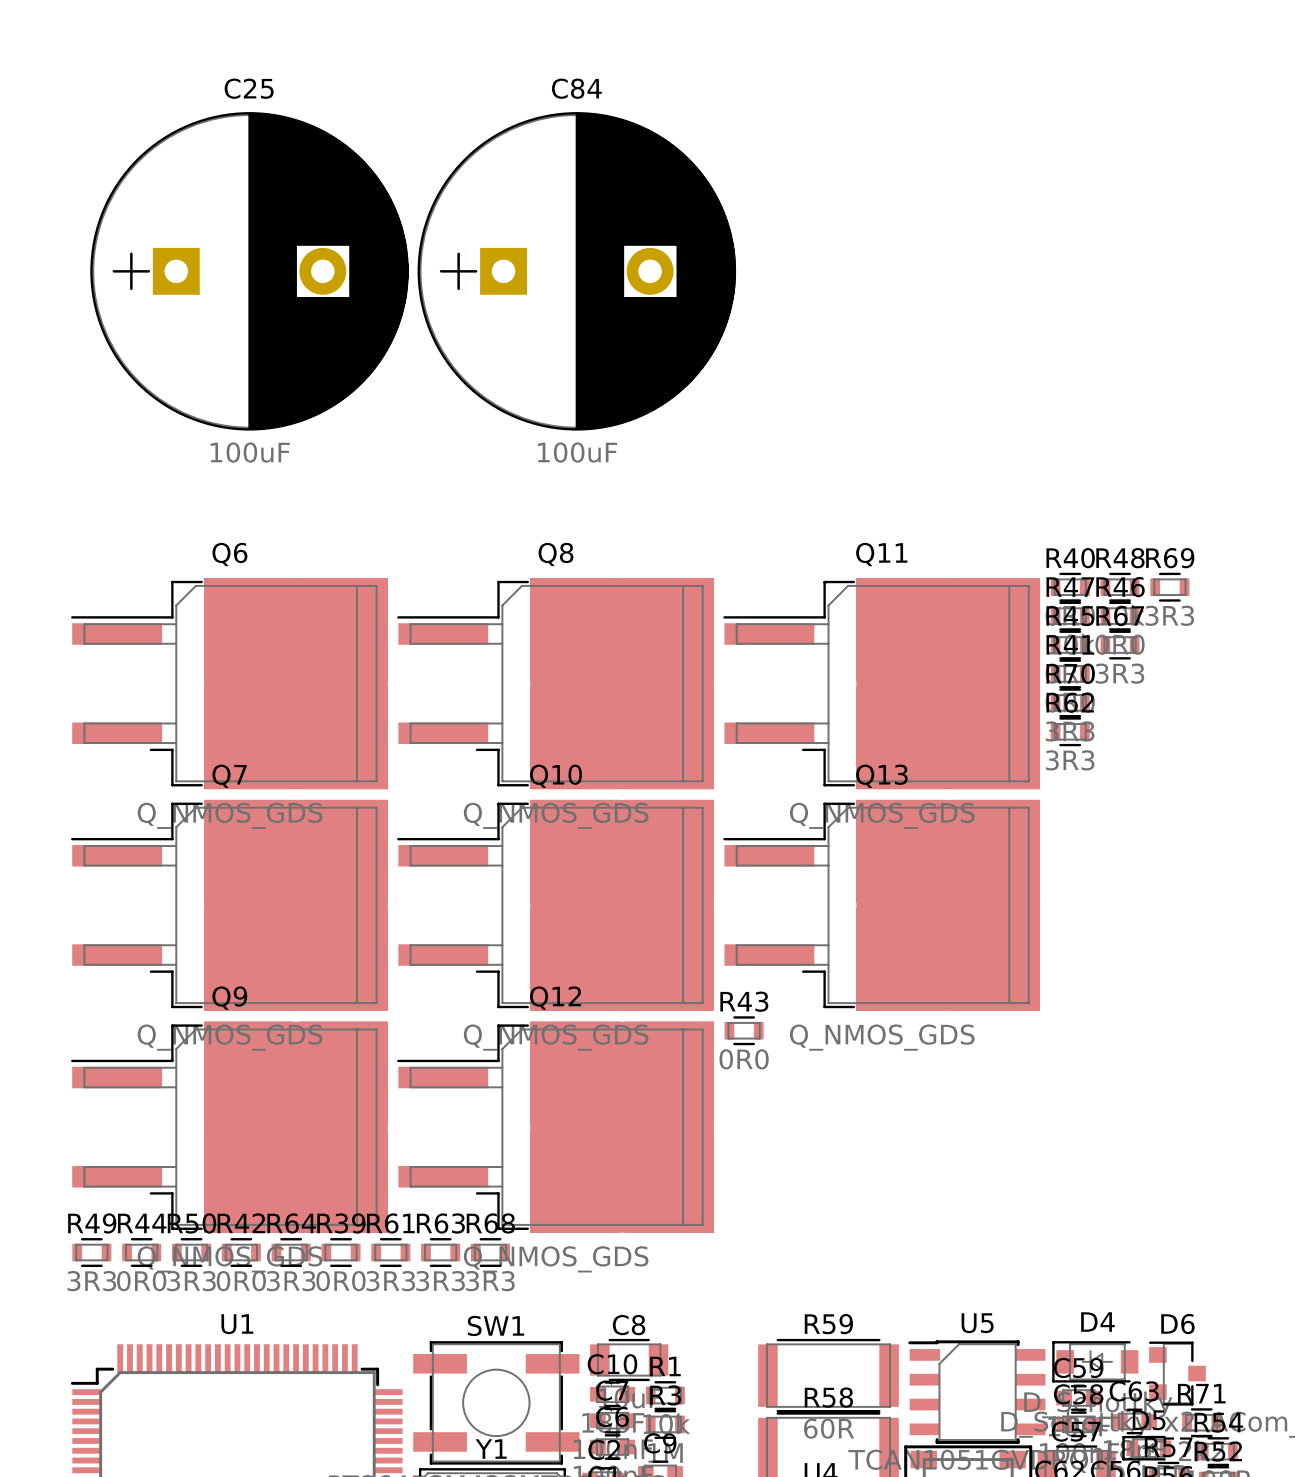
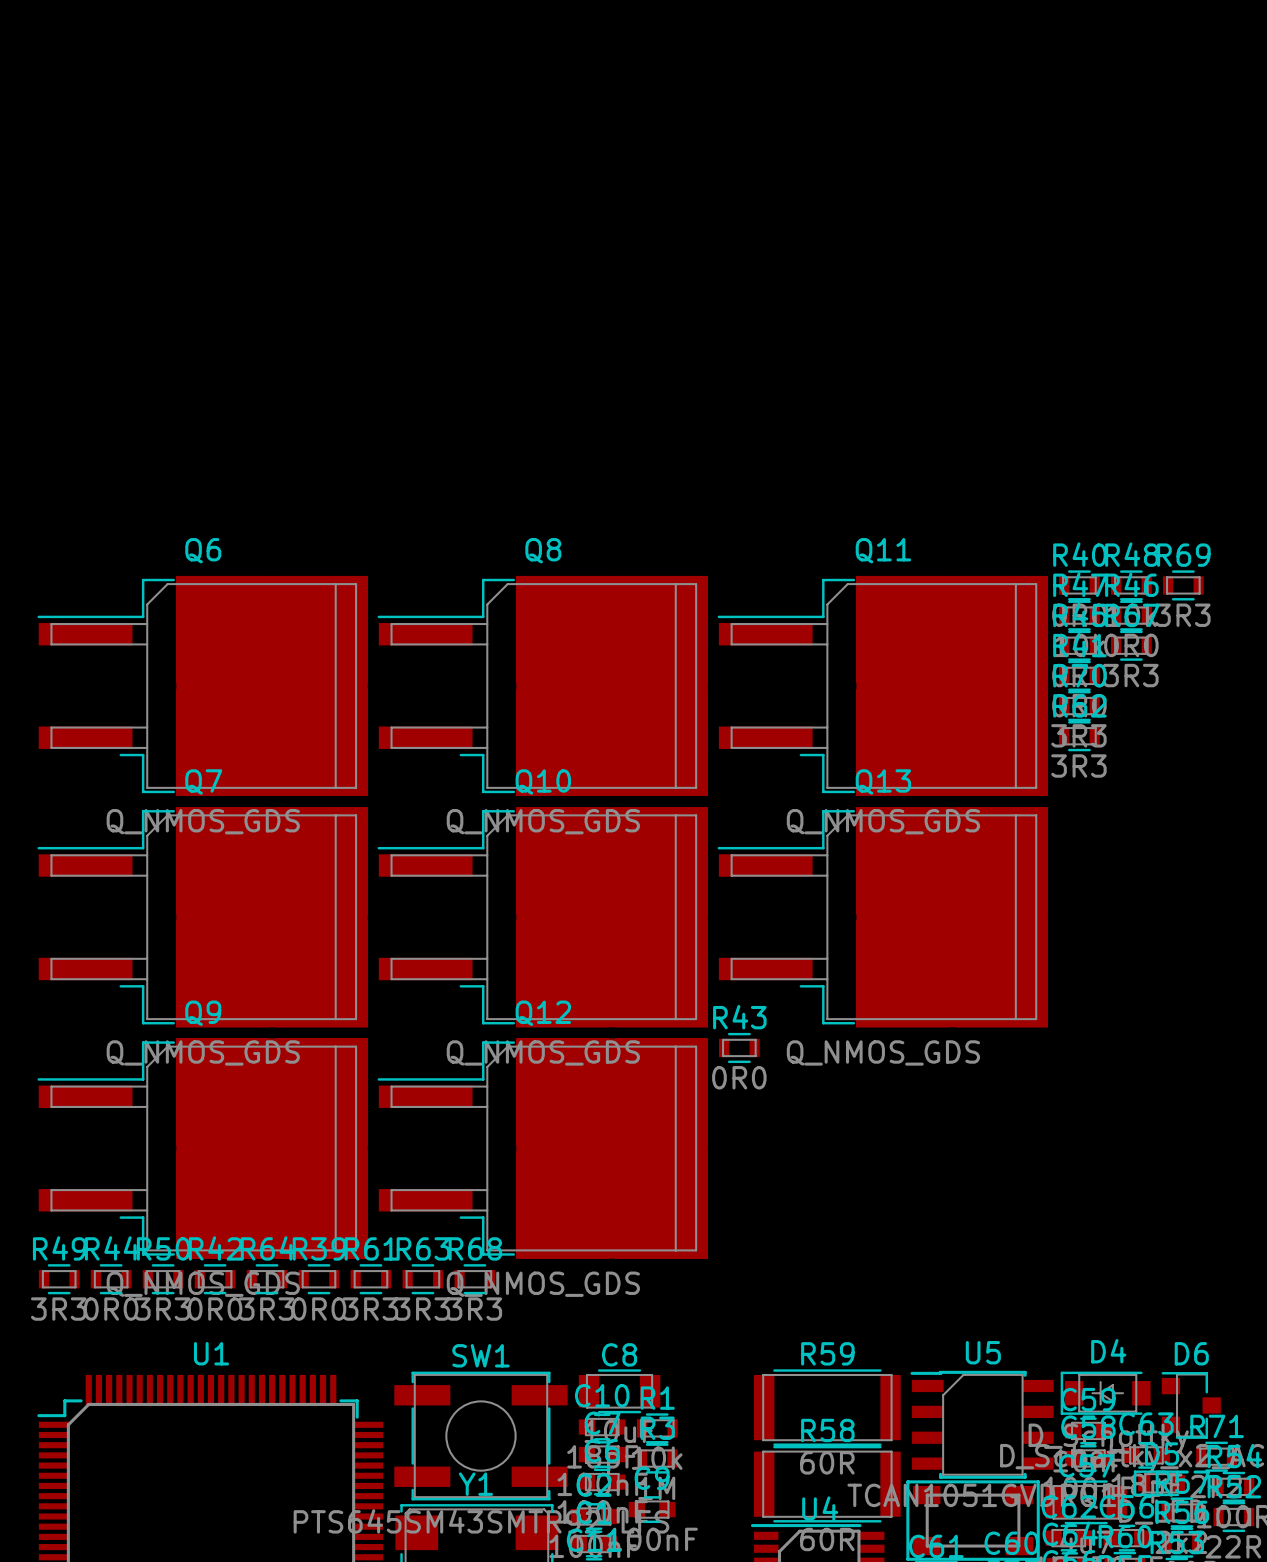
C25: 100uF (249, 271) -> none
C84: 100uF (576, 271) -> none

